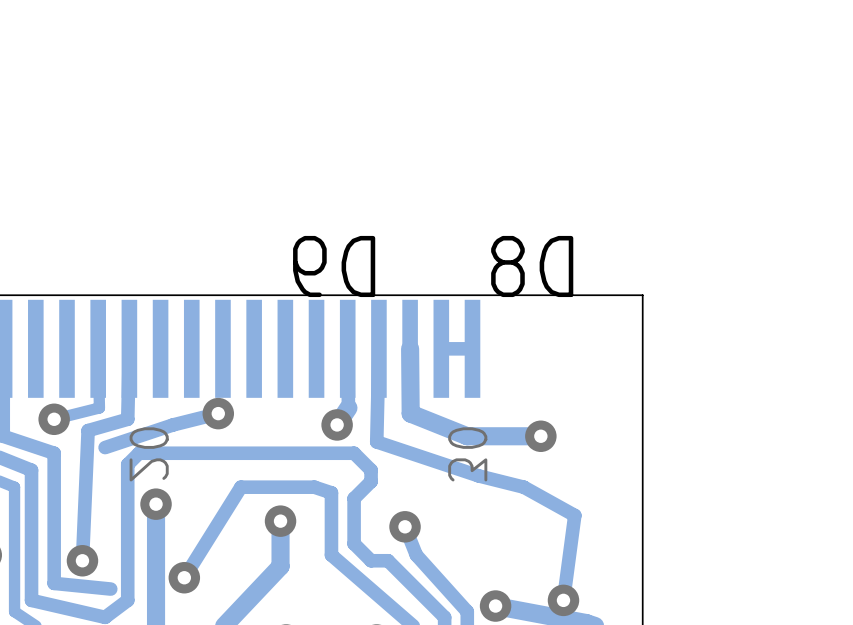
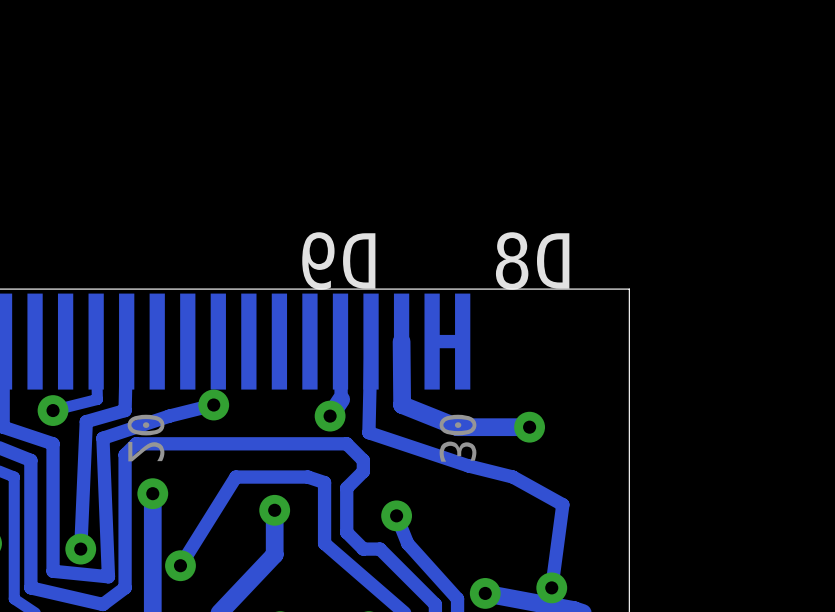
track: none -> (102, 438) (108, 576)

